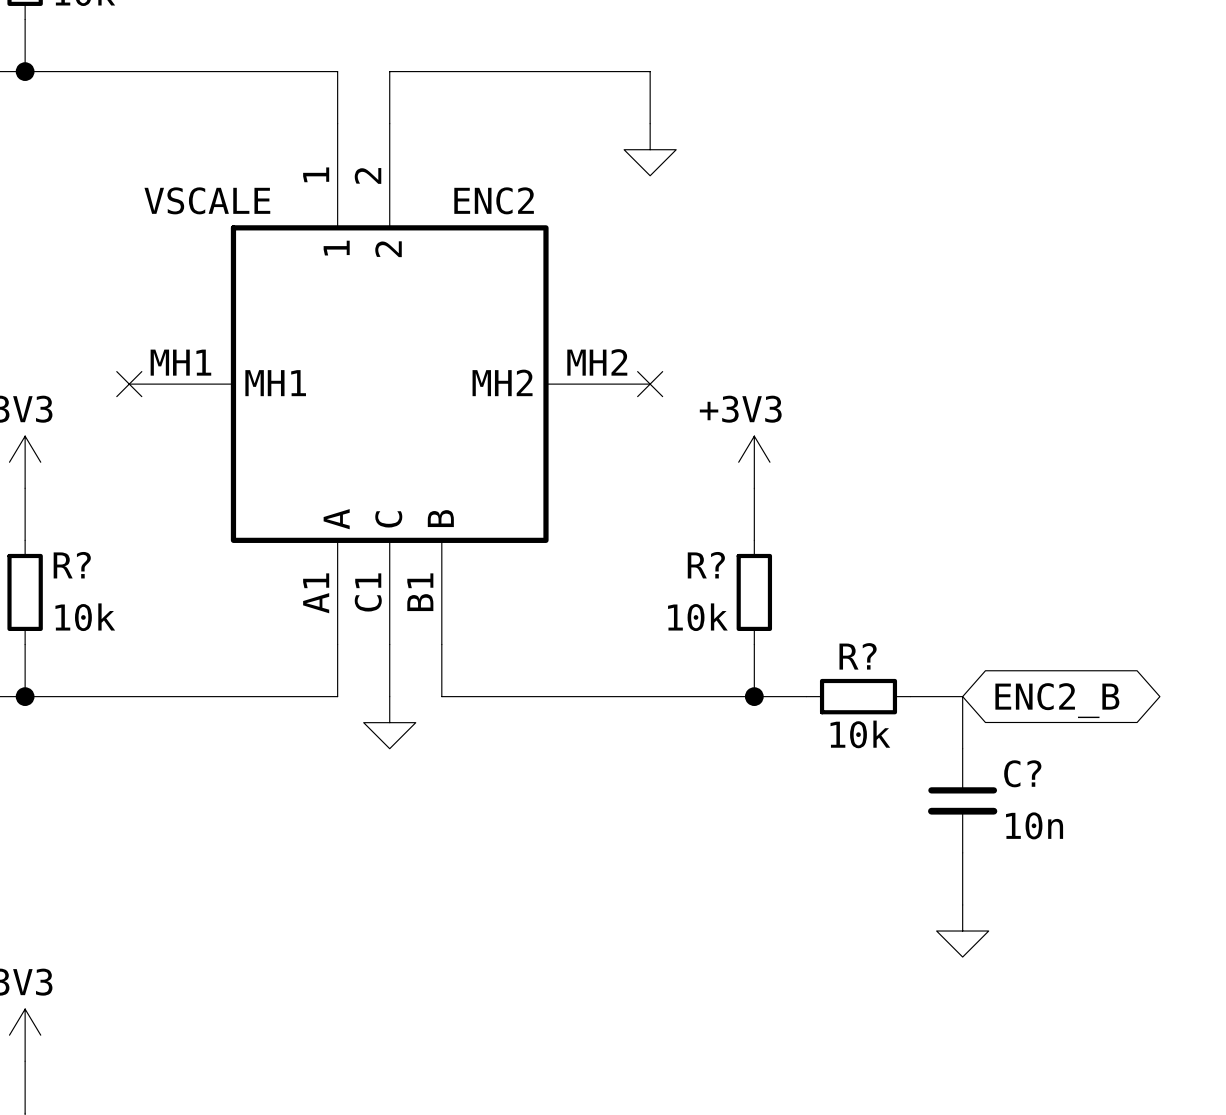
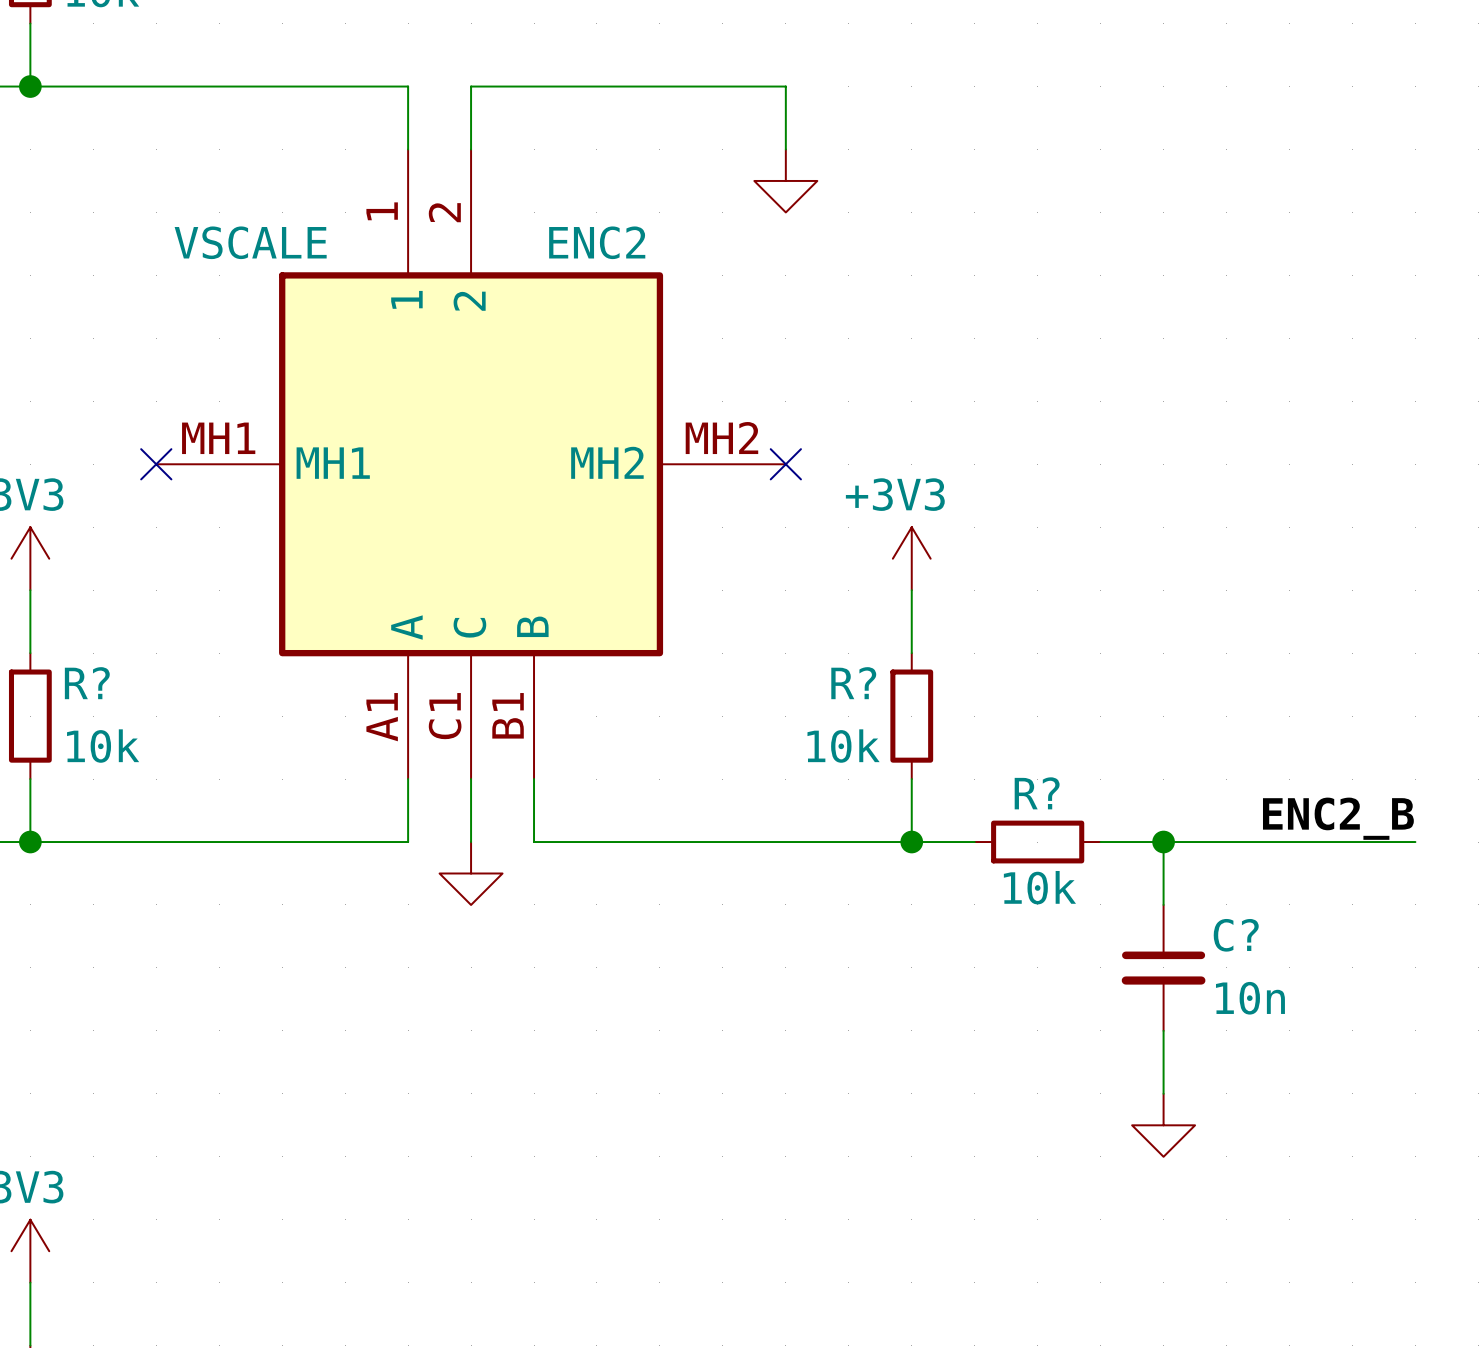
label: none -> ENC2_B (1338, 818)
wire: none -> (1163, 842) (1415, 842)
junction: none -> (1163, 842)
global label: ENC2_B (1057, 700) -> none

